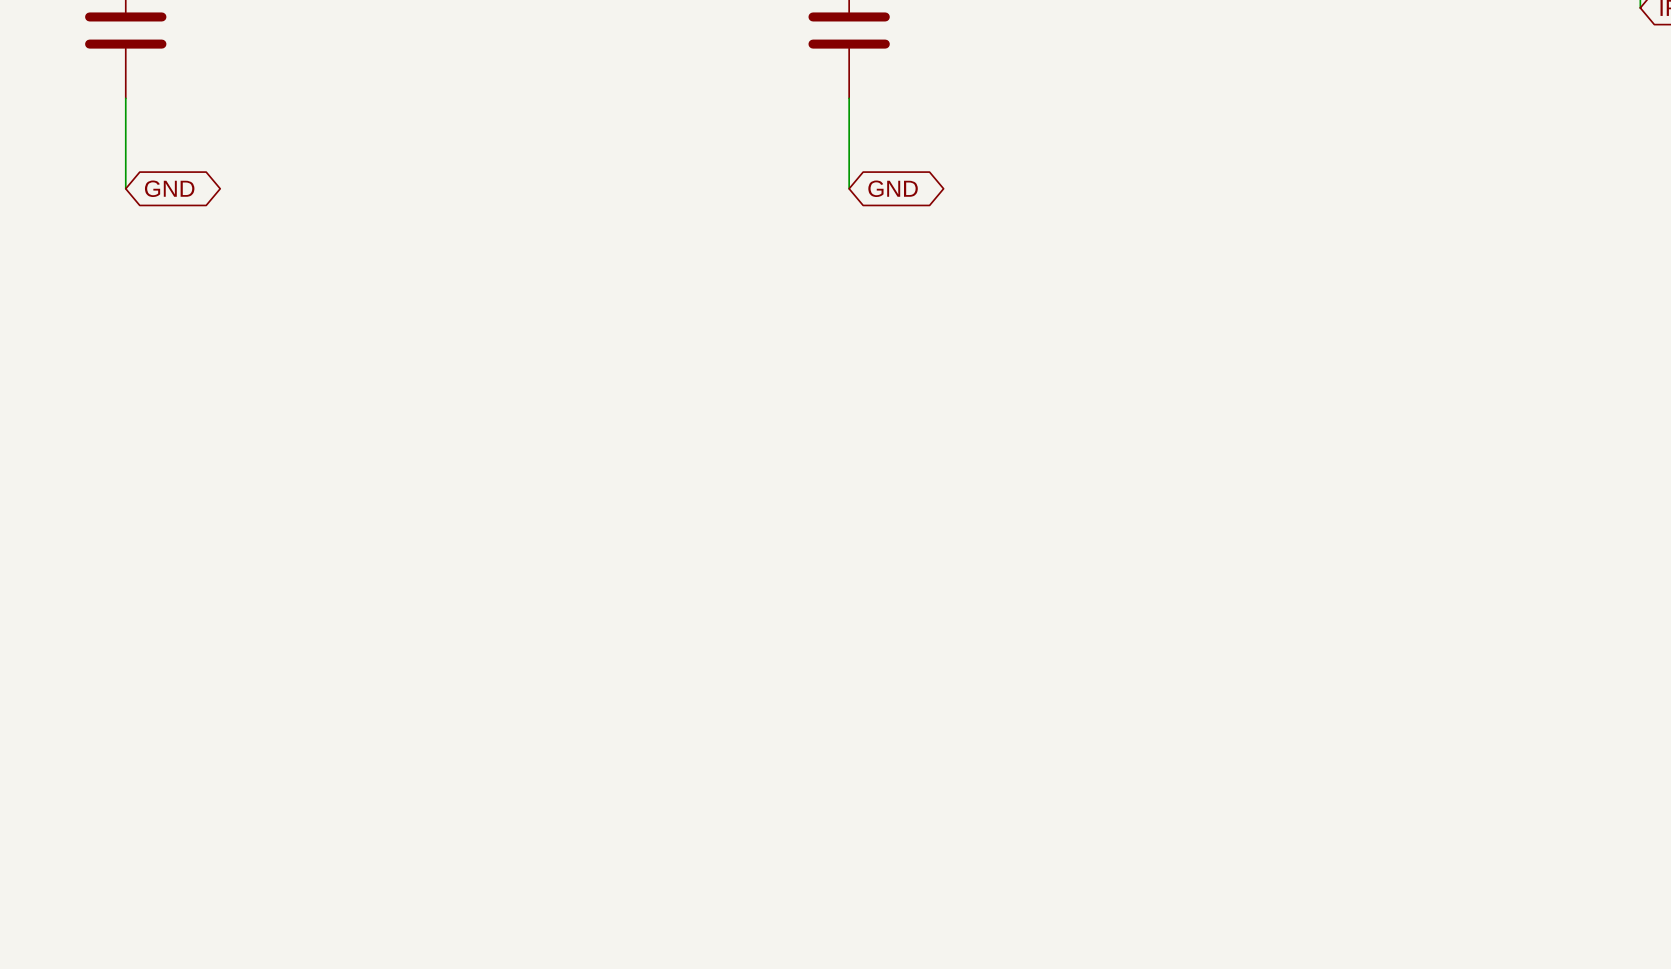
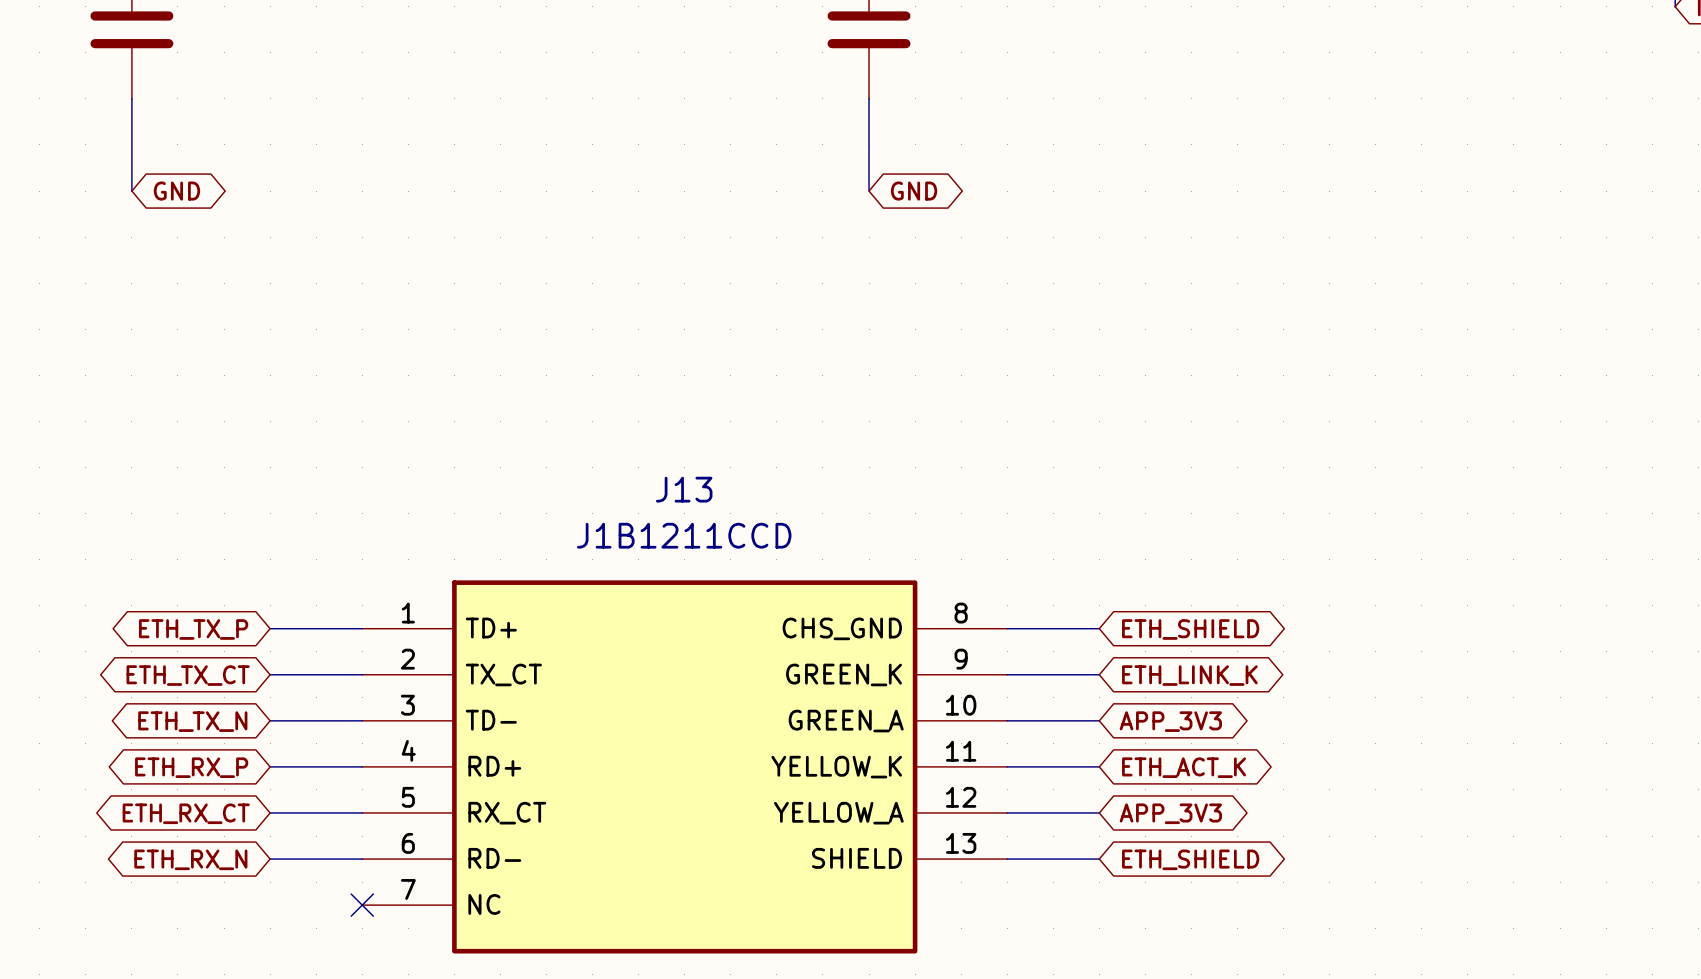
wire: none -> (270, 628) (362, 628)
wire: none -> (1007, 628) (1099, 628)
global label: none -> ETH_TX_P (193, 629)
global label: none -> ETH_SHIELD (1190, 629)
wire: none -> (270, 674) (362, 674)
wire: none -> (1007, 674) (1099, 674)
global label: none -> ETH_TX_CT (188, 675)
global label: none -> ETH_LINK_K (1189, 675)
wire: none -> (270, 720) (362, 720)
wire: none -> (1007, 720) (1099, 720)
global label: none -> APP_3V3 (1170, 721)
global label: none -> ETH_TX_N (192, 721)
wire: none -> (270, 766) (362, 766)
J13: none -> J1B1211CCD (684, 766)
wire: none -> (1007, 766) (1099, 766)
global label: none -> ETH_RX_P (191, 767)
global label: none -> ETH_ACT_K (1184, 767)
wire: none -> (270, 812) (362, 812)
wire: none -> (1007, 812) (1099, 812)
global label: none -> ETH_RX_CT (186, 813)
global label: none -> APP_3V3 (1170, 813)
wire: none -> (270, 859) (362, 859)
wire: none -> (1007, 859) (1099, 859)
global label: none -> ETH_RX_N (190, 859)
global label: none -> ETH_SHIELD (1190, 859)
no-connect mark: none -> (362, 905)

